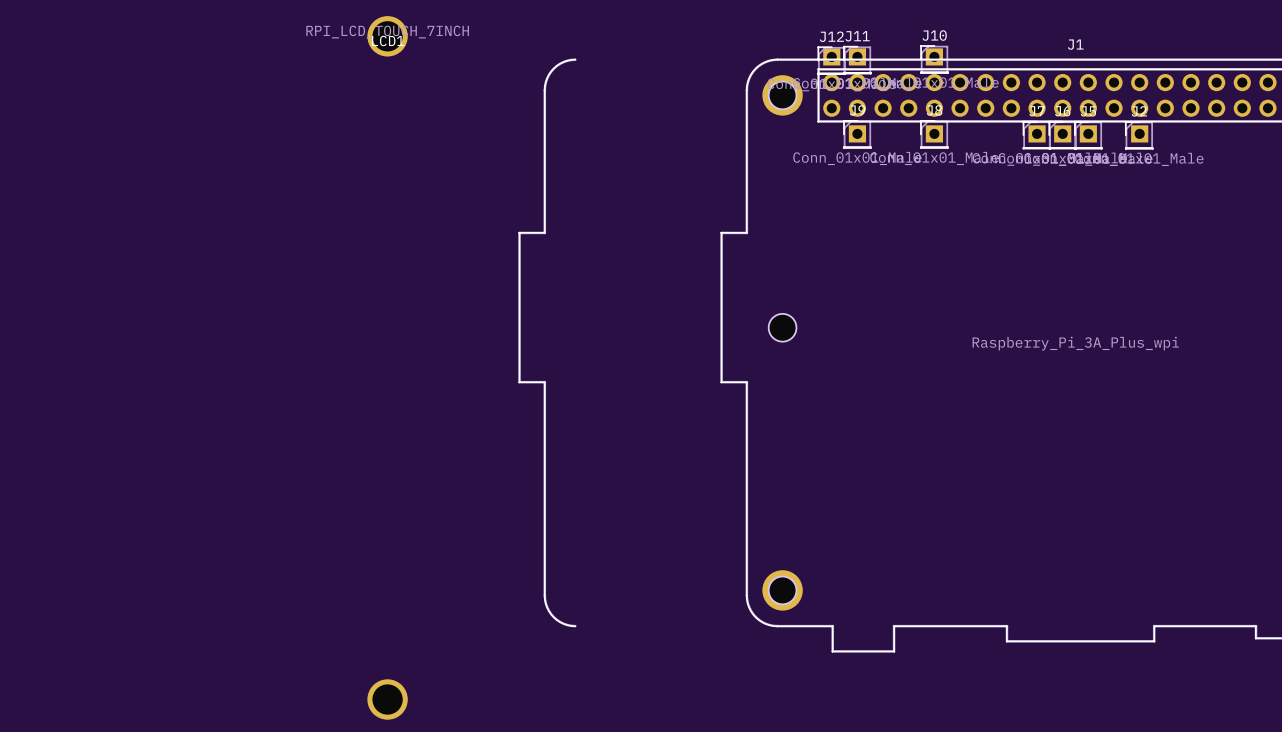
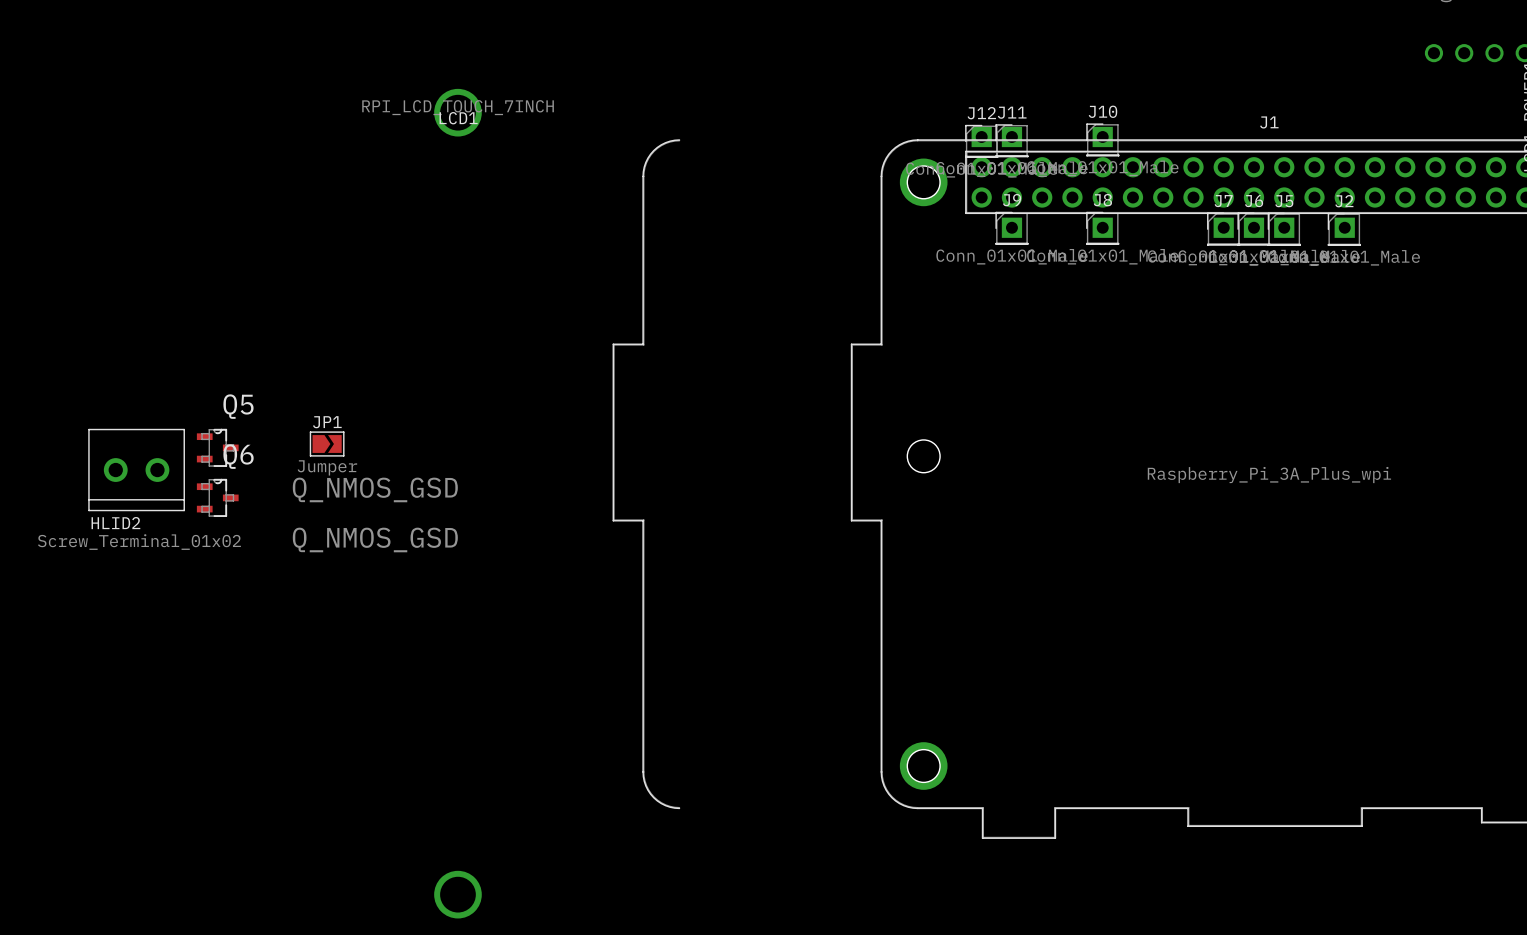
JP1: none -> Jumper (327, 444)
Q5: none -> Q_NMOS_GSD (217, 447)
HLID2: none -> Screw_Terminal_01x02 (136, 470)
Q6: none -> Q_NMOS_GSD (217, 497)

